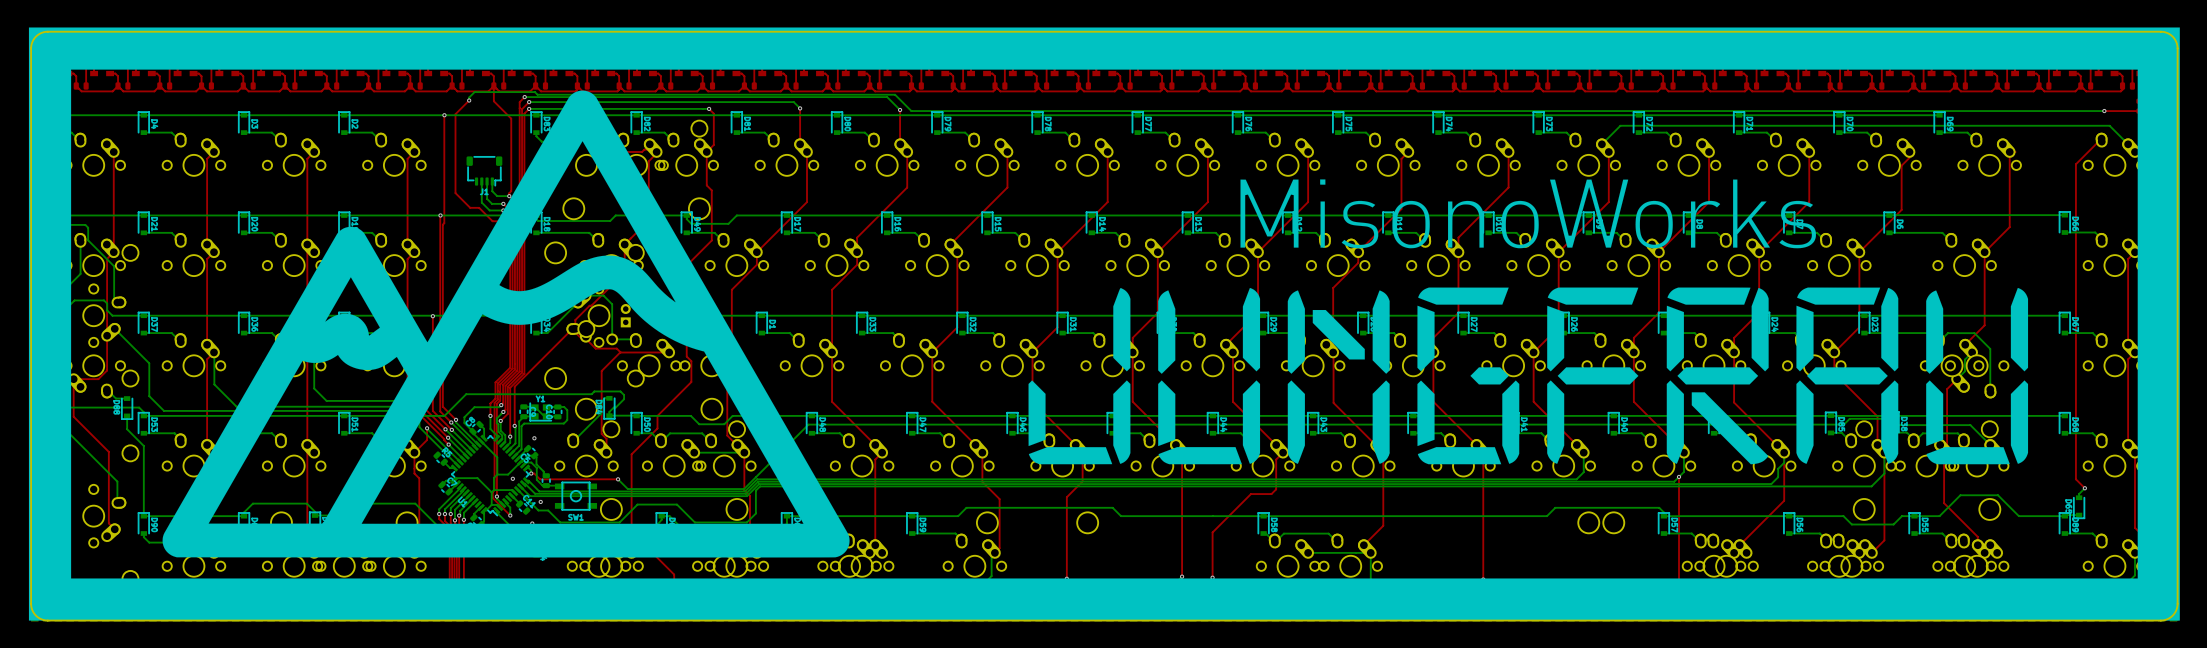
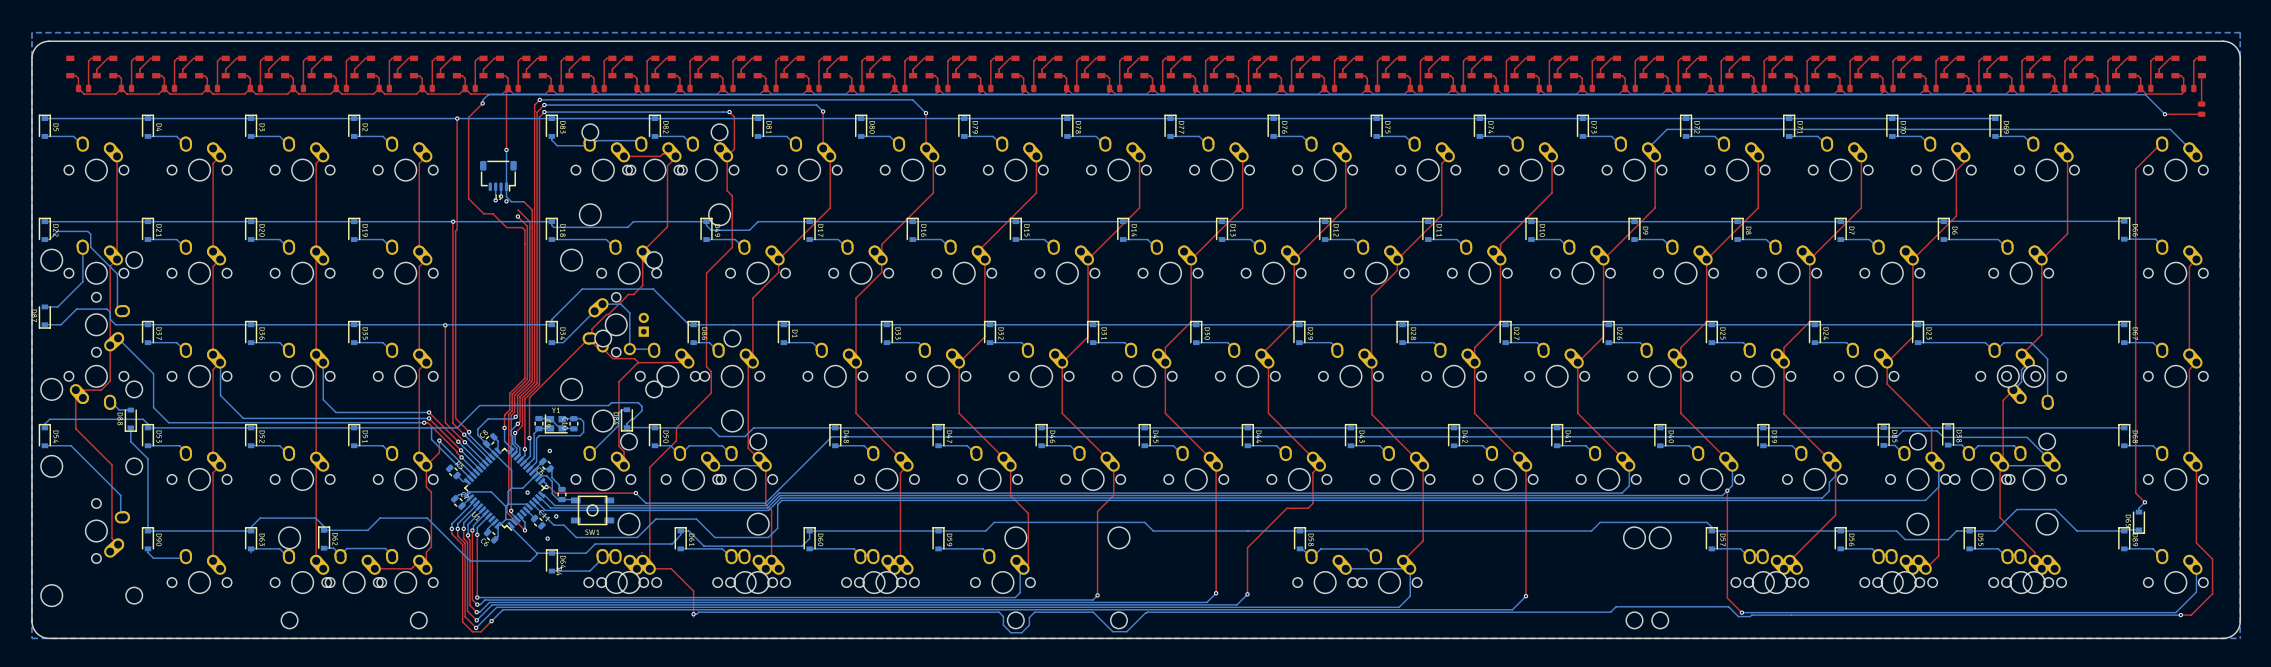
drawing: [28, 27, 2180, 621] -> none
board edge: (47, 31) (2160, 31) (2169, 33) (2175, 40) (2177, 56) -> (31, 58) (37, 46) (49, 41) (2223, 41) (2235, 46) (2240, 58)
board edge: (47, 31) (39, 33) (33, 40) (31, 56) -> none
top track: (493, 86) (493, 101) (511, 118) (511, 191) (509, 196) -> none
top track: none -> (506, 90) (506, 149)
bottom track: (534, 92) (537, 94) (895, 94) (911, 111) (2104, 111) -> (550, 94) (2145, 94) (2164, 114)
bottom track: none -> (506, 149) (506, 186)
via: none -> (506, 149)
bottom track: (487, 191) (487, 198) (492, 203) (503, 203) -> none
via: none -> (501, 196)
bottom track: (481, 194) (481, 202) (489, 210) (503, 210) -> none
via: none -> (495, 200)
via: none -> (506, 201)
via: (509, 196) -> none
via: (503, 203) -> none

